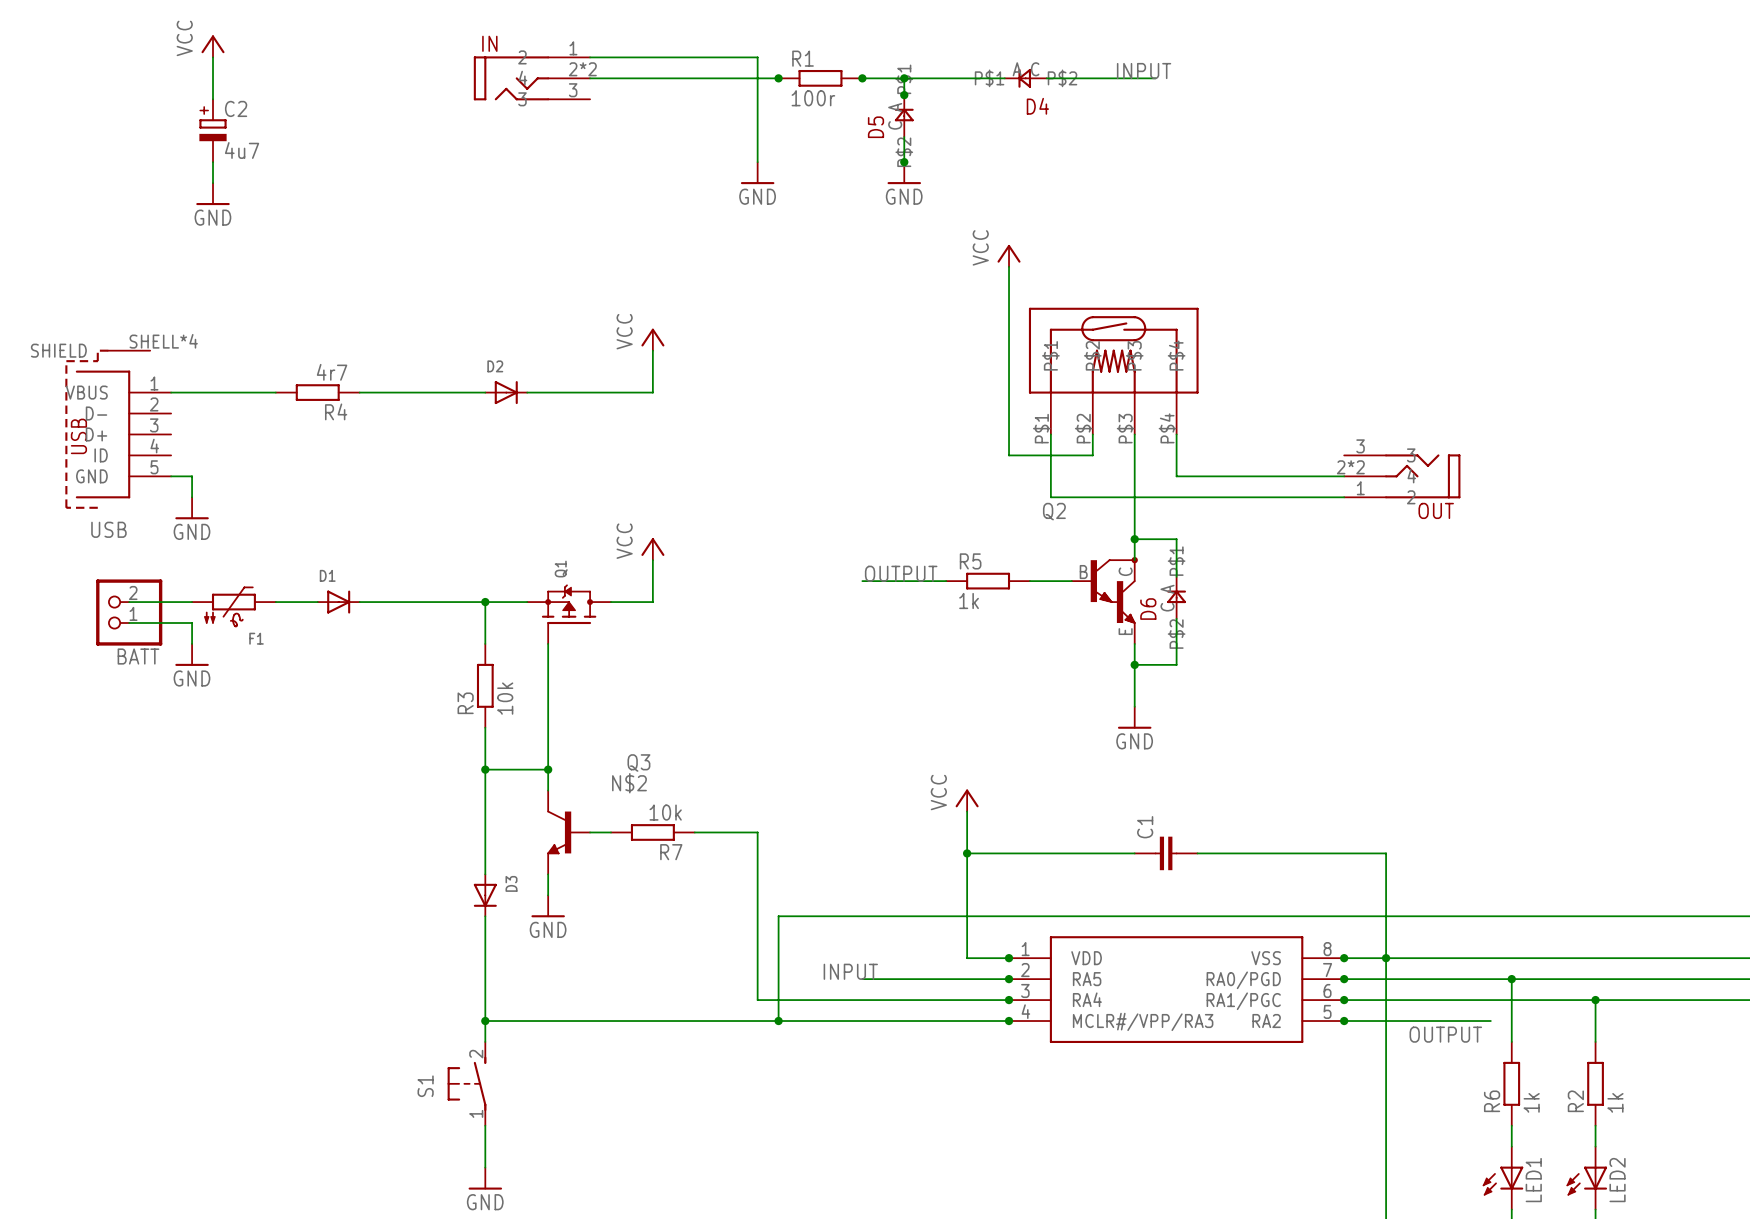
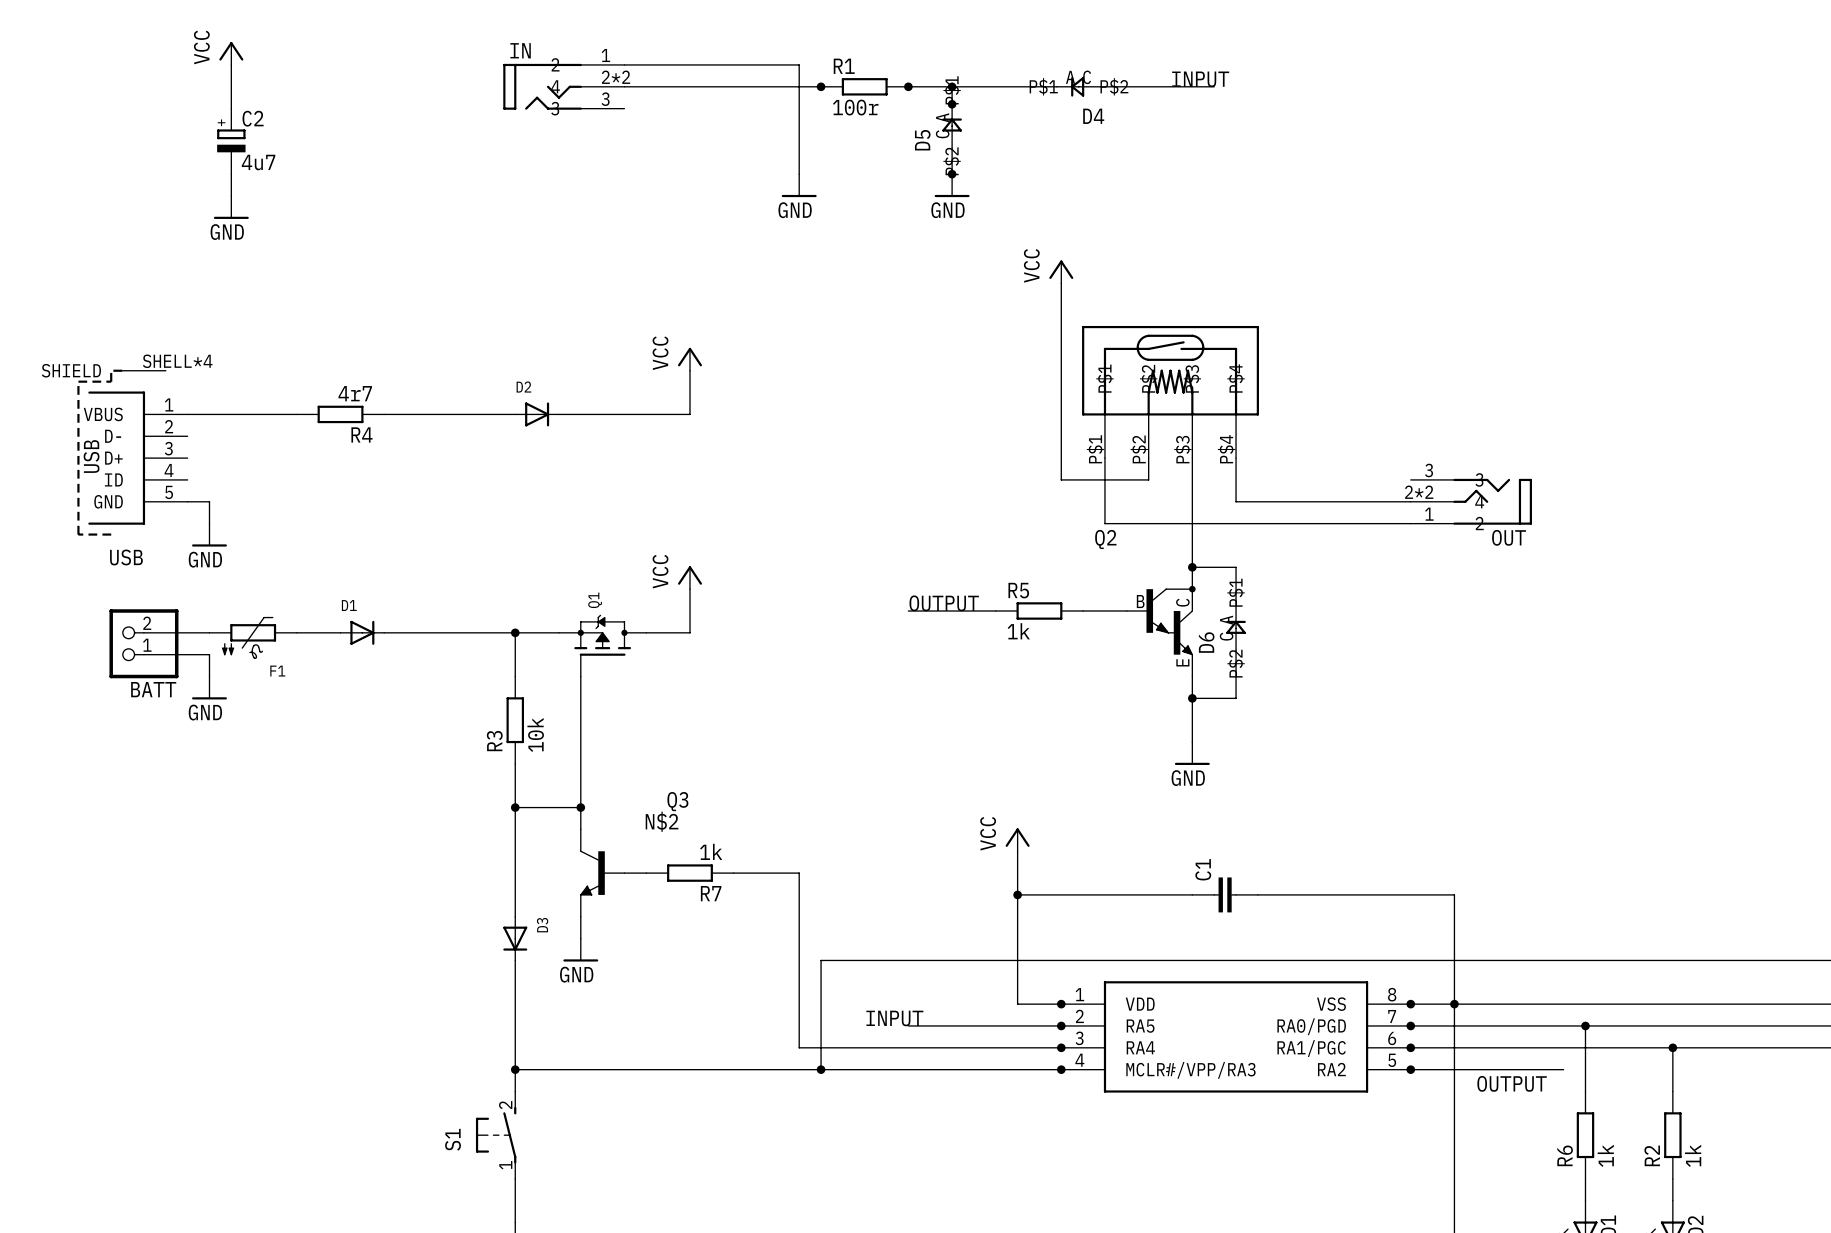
R7 value: 10k (665, 812) -> 1k (711, 851)

